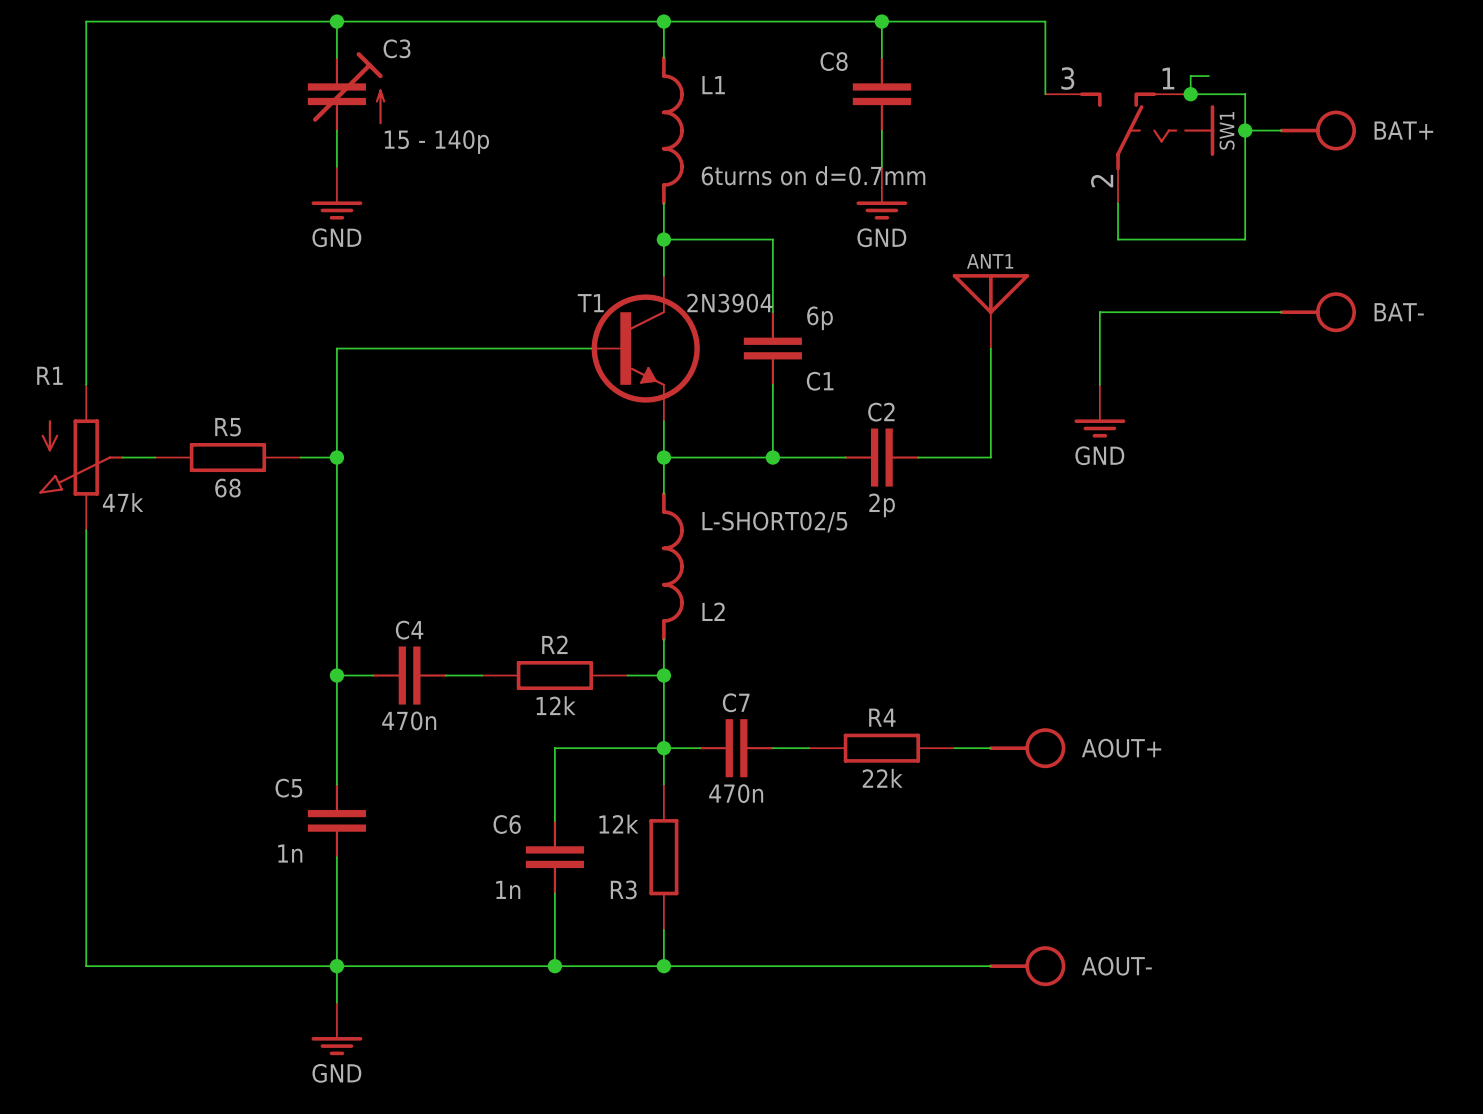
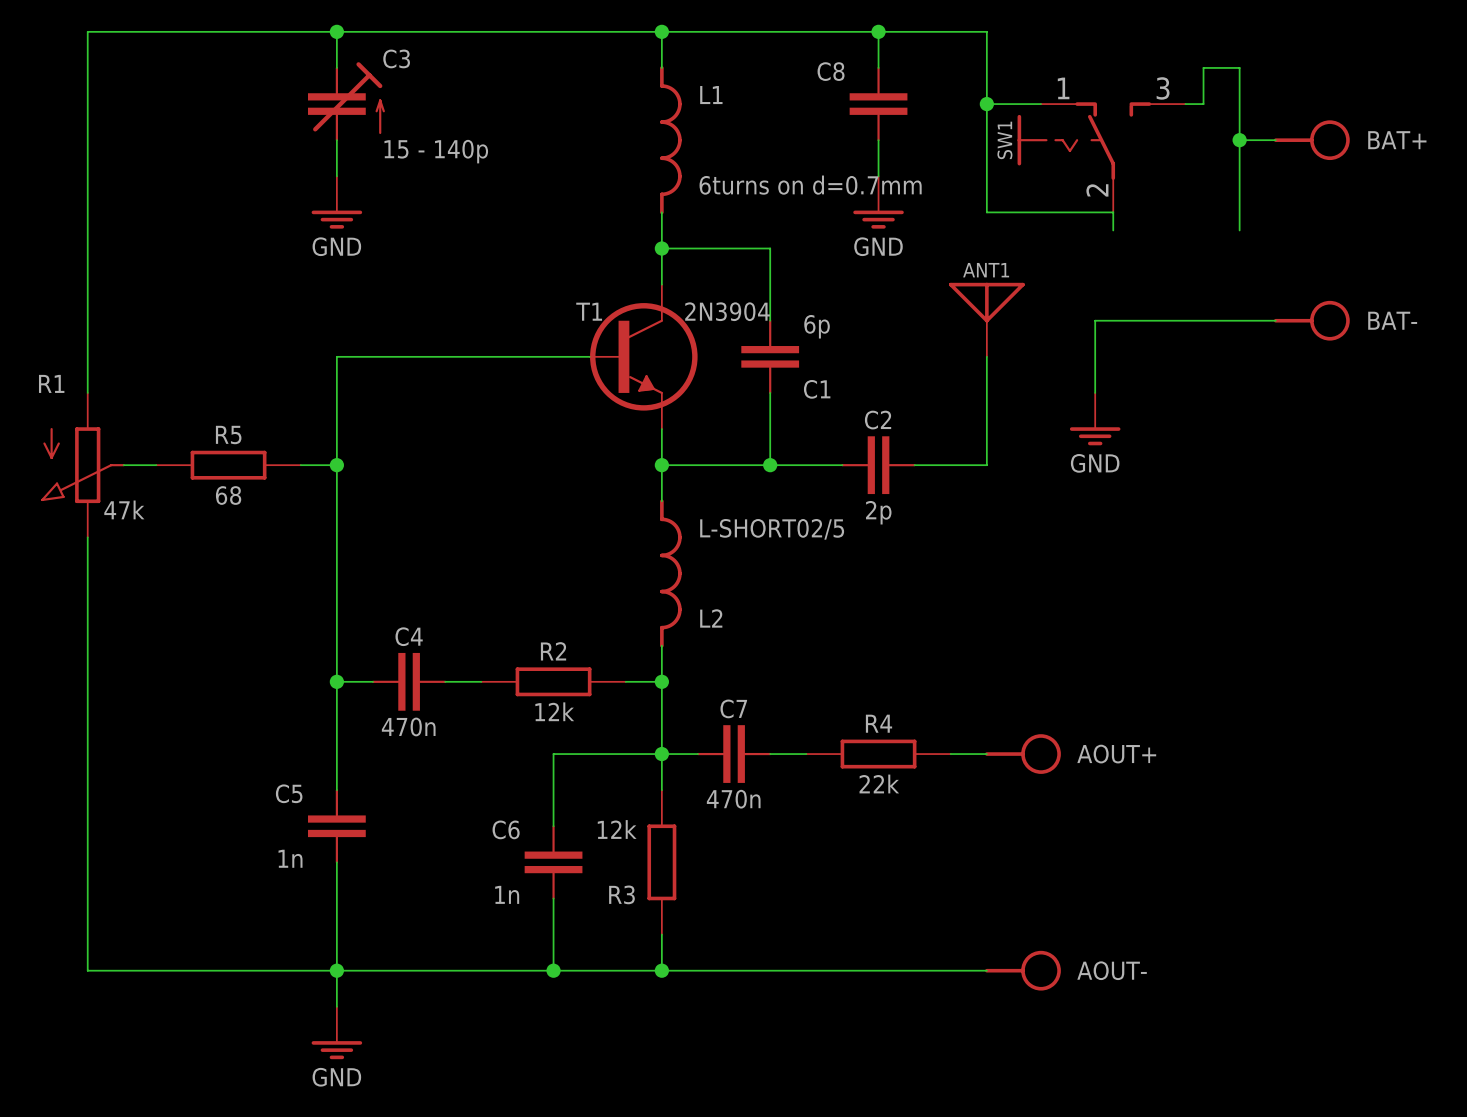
wire: (990, 21) (1045, 21) (1045, 94) -> (986, 104) (1041, 104)
wire: none -> (986, 31) (986, 212) (1113, 212)
wire: (1208, 76) (1190, 76) (1190, 94) -> none
junction: none -> (986, 104)
junction: (1190, 94) -> none
wire: (1208, 94) (1245, 94) -> (1203, 104) (1203, 67) (1239, 67) (1239, 104)
SW1 flip: as is (1147, 131) -> left-right (1084, 141)
wire: (1118, 221) (1118, 239) (1245, 239) (1245, 221) -> none

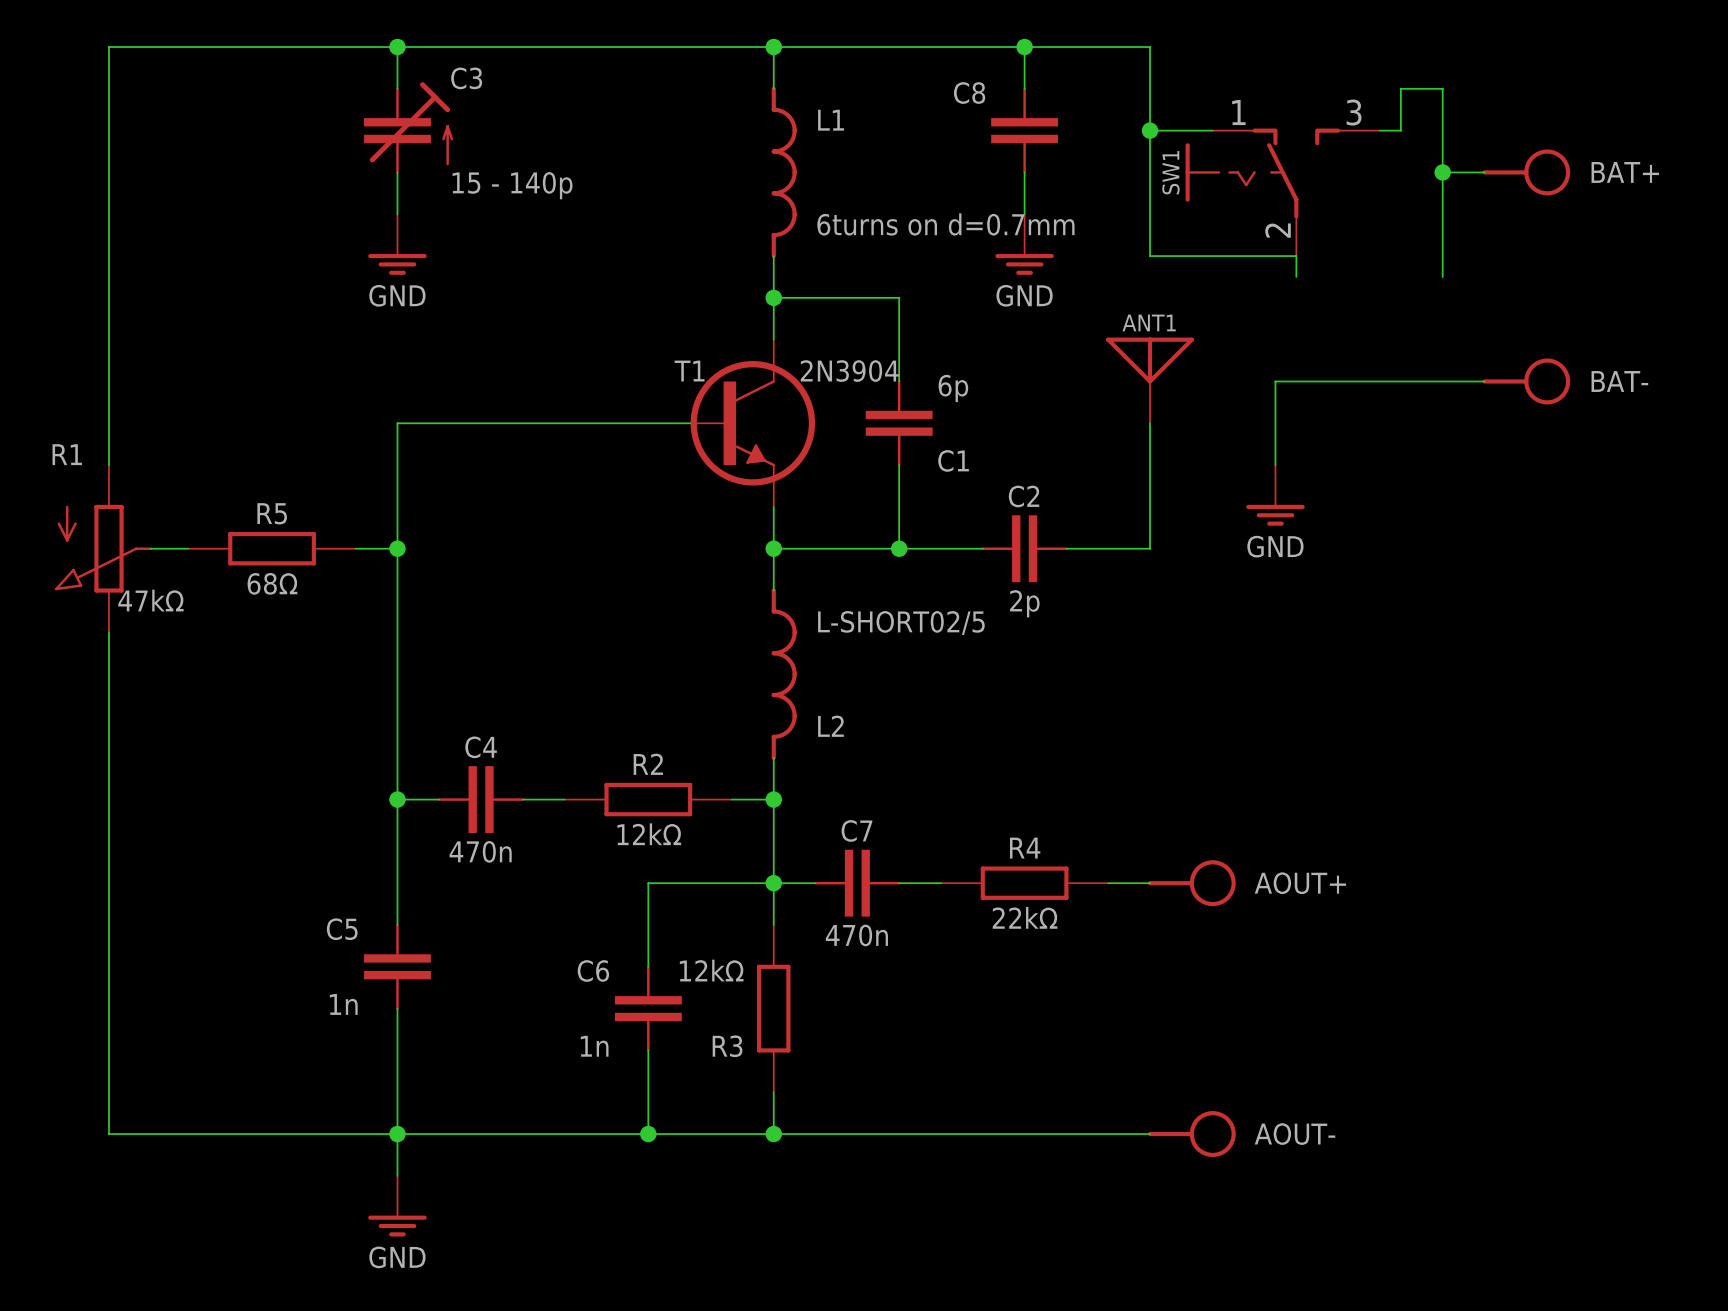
R5 value: 68 (228, 495) -> 68Ω (272, 583)
R1 value: 47k (124, 509) -> 47kΩ (150, 600)
R2 value: 12k (554, 711) -> 12kΩ (649, 834)
R4 value: 22k (879, 783) -> 22kΩ (1025, 917)
R3 value: 12k (617, 829) -> 12kΩ (711, 970)

